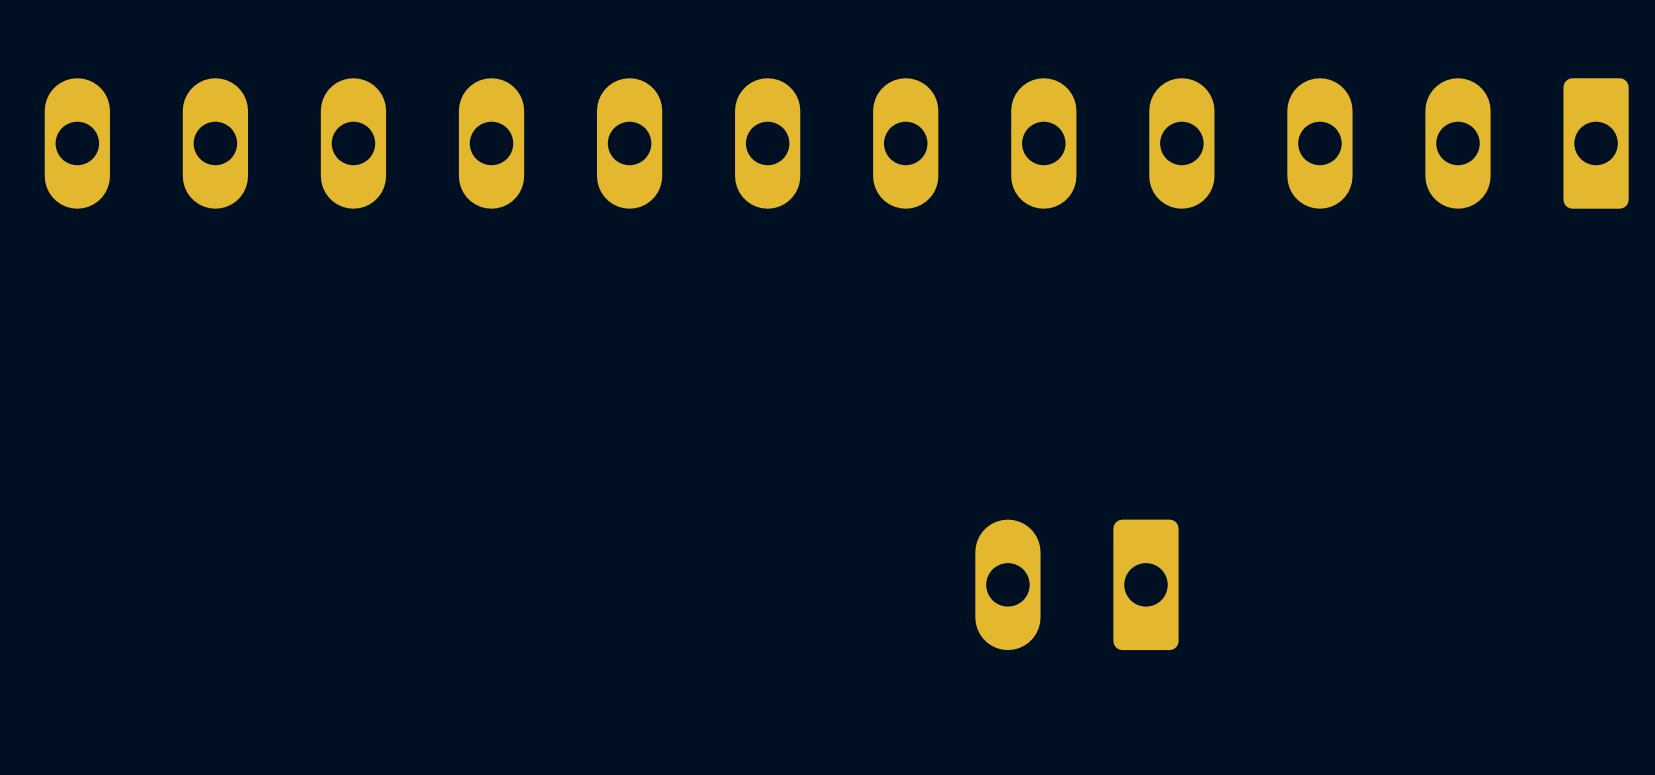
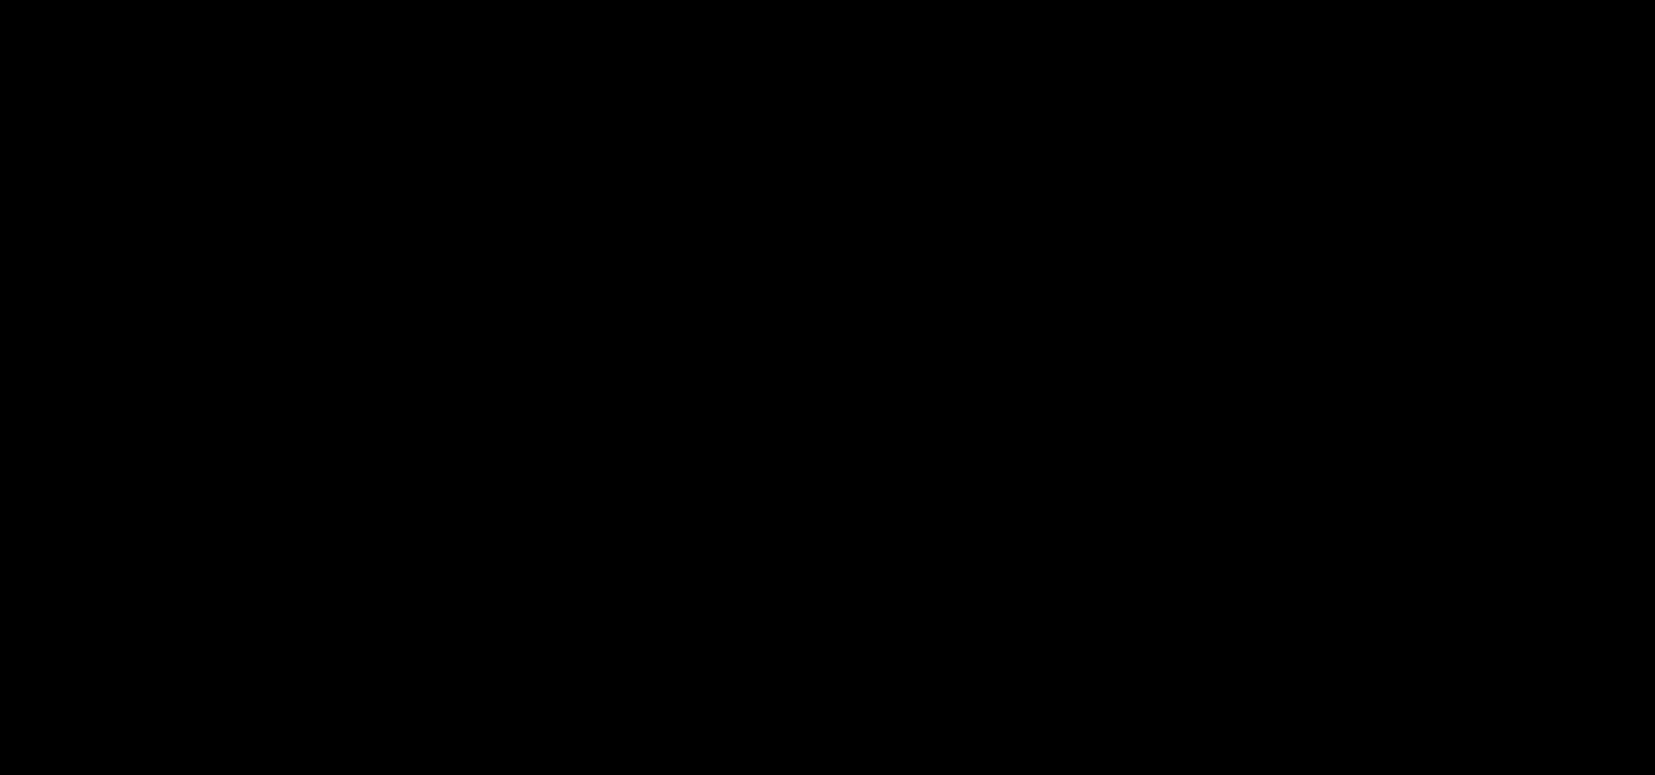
part: (836, 143) -> none
part: (1076, 584) -> none

